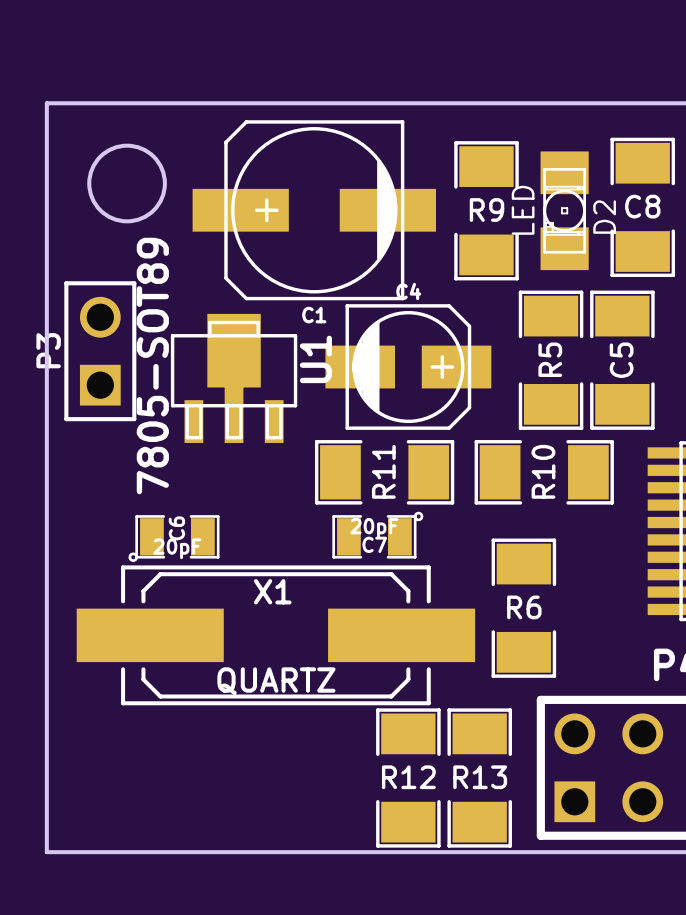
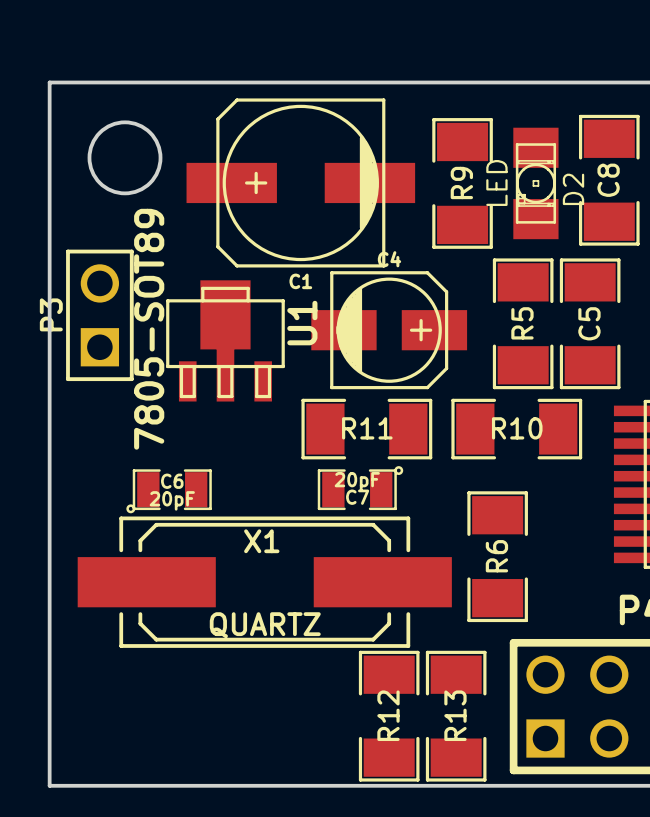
C8 name rotation: 0° (642, 206) -> 90° counterclockwise (608, 180)
R9 name rotation: 0° (486, 210) -> 90° counterclockwise (461, 182)
R11 name rotation: 0° (383, 471) -> 90° clockwise (367, 428)
R10 name rotation: 0° (543, 471) -> 90° clockwise (517, 428)
C6 name rotation: 0° (176, 528) -> 90° clockwise (172, 481)
R6 name rotation: 0° (524, 607) -> 90° counterclockwise (496, 556)
R12 name rotation: 0° (408, 777) -> 90° counterclockwise (388, 715)
R13 name rotation: 0° (480, 777) -> 90° counterclockwise (455, 715)

